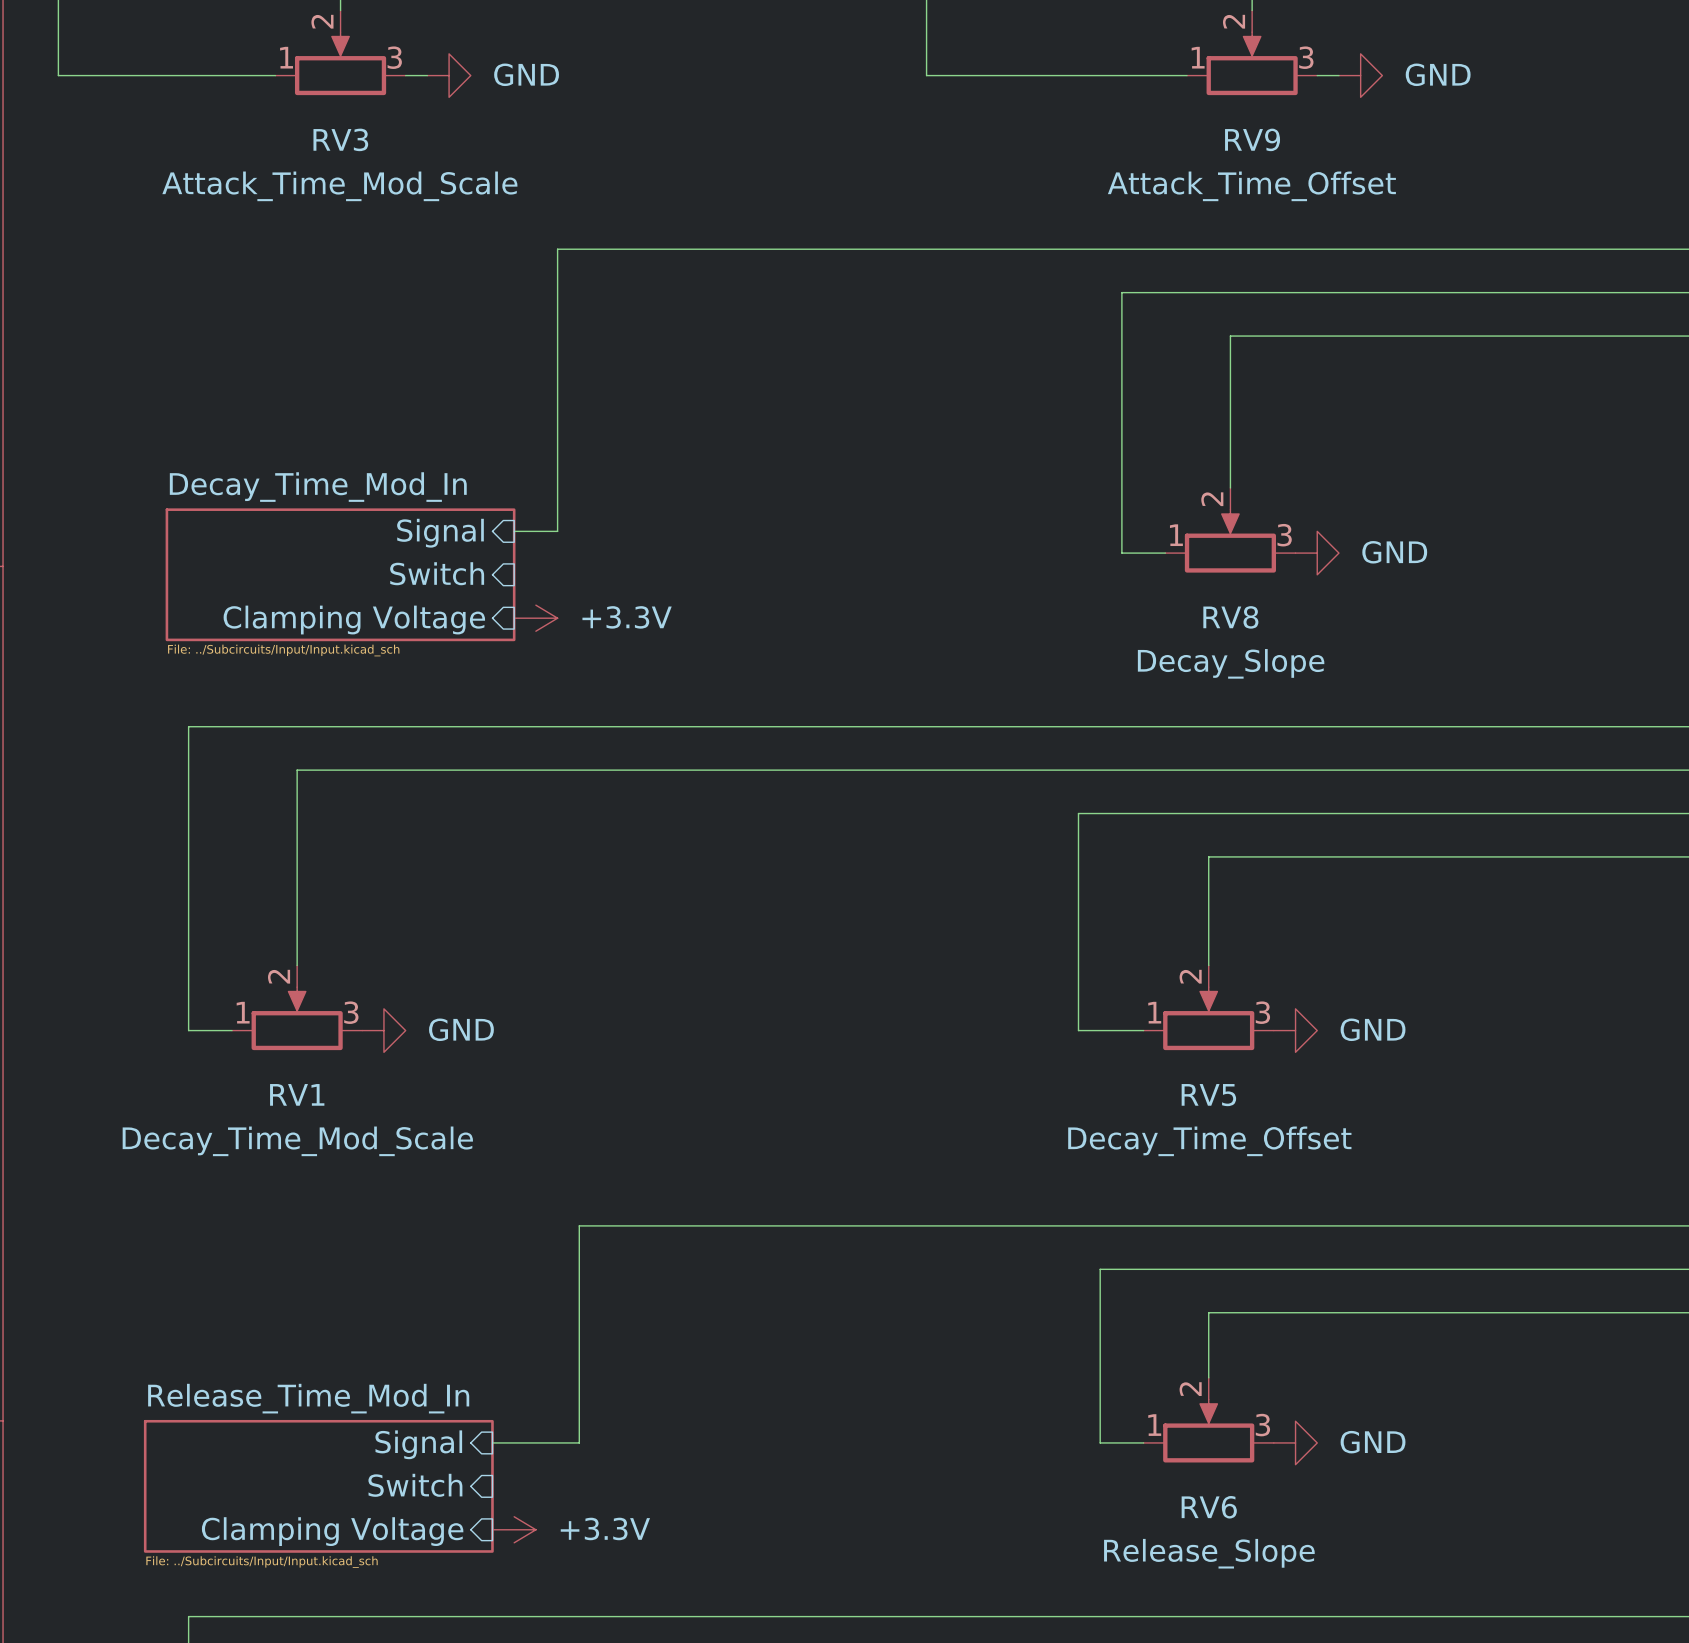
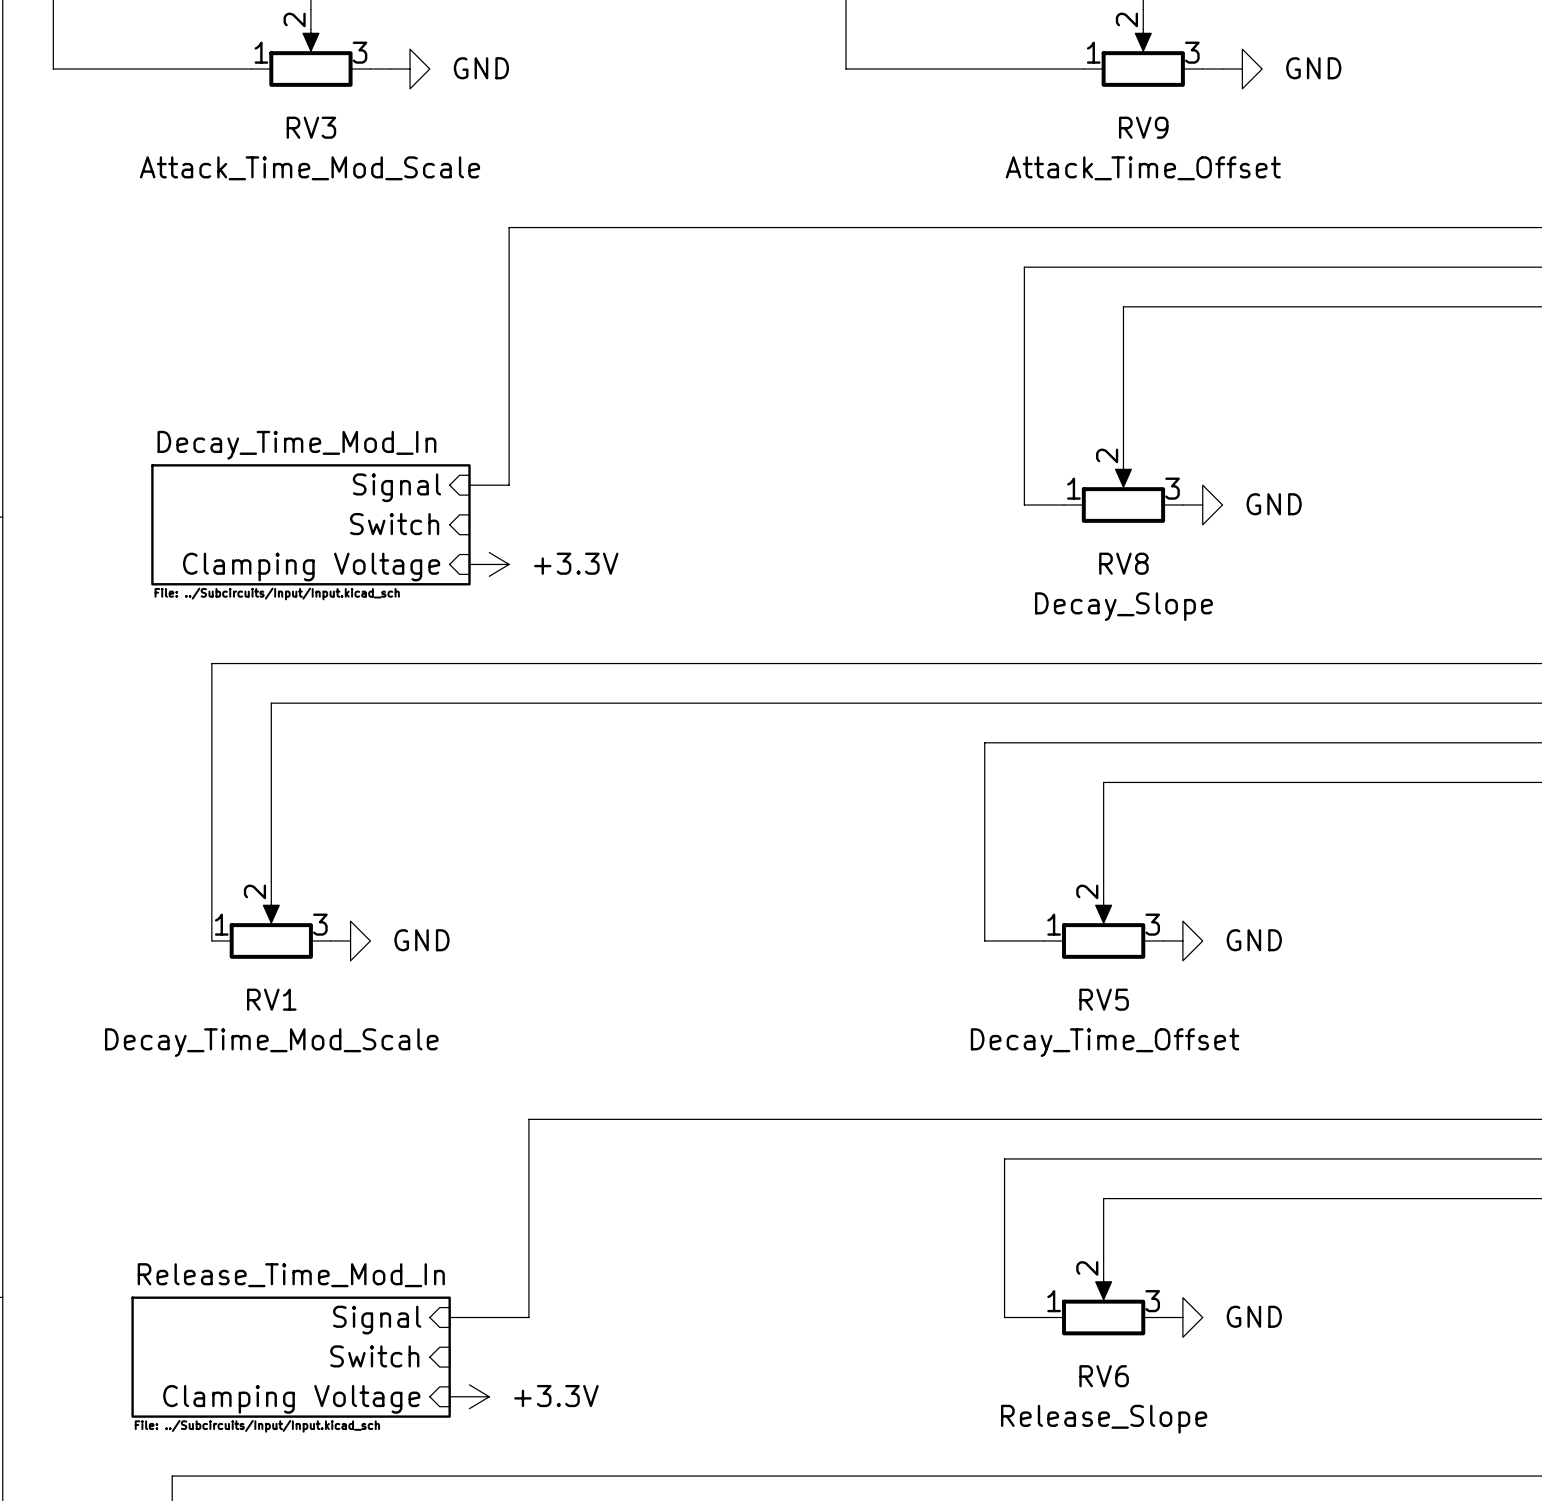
wire: (232, 726) (188, 726) (188, 1030) (232, 1030) -> (211, 663) (211, 940)

